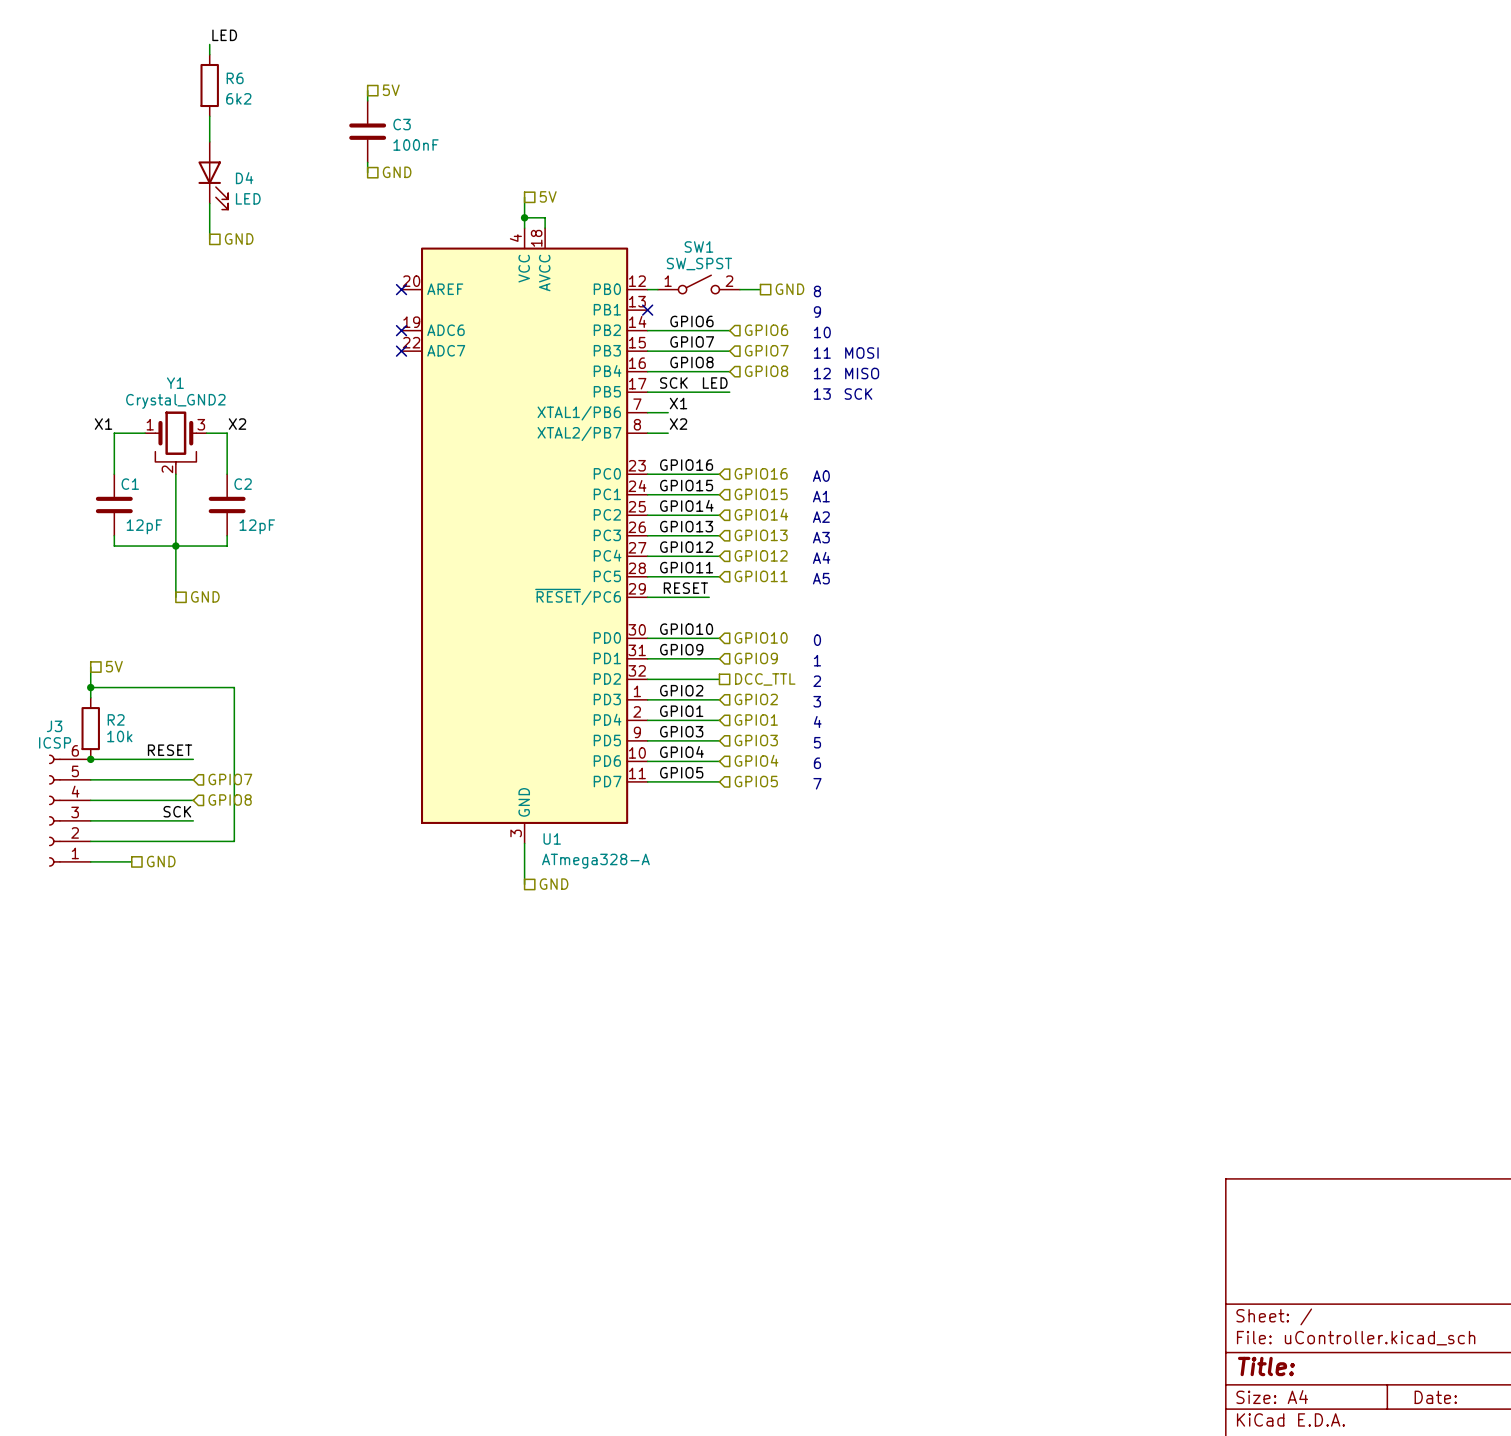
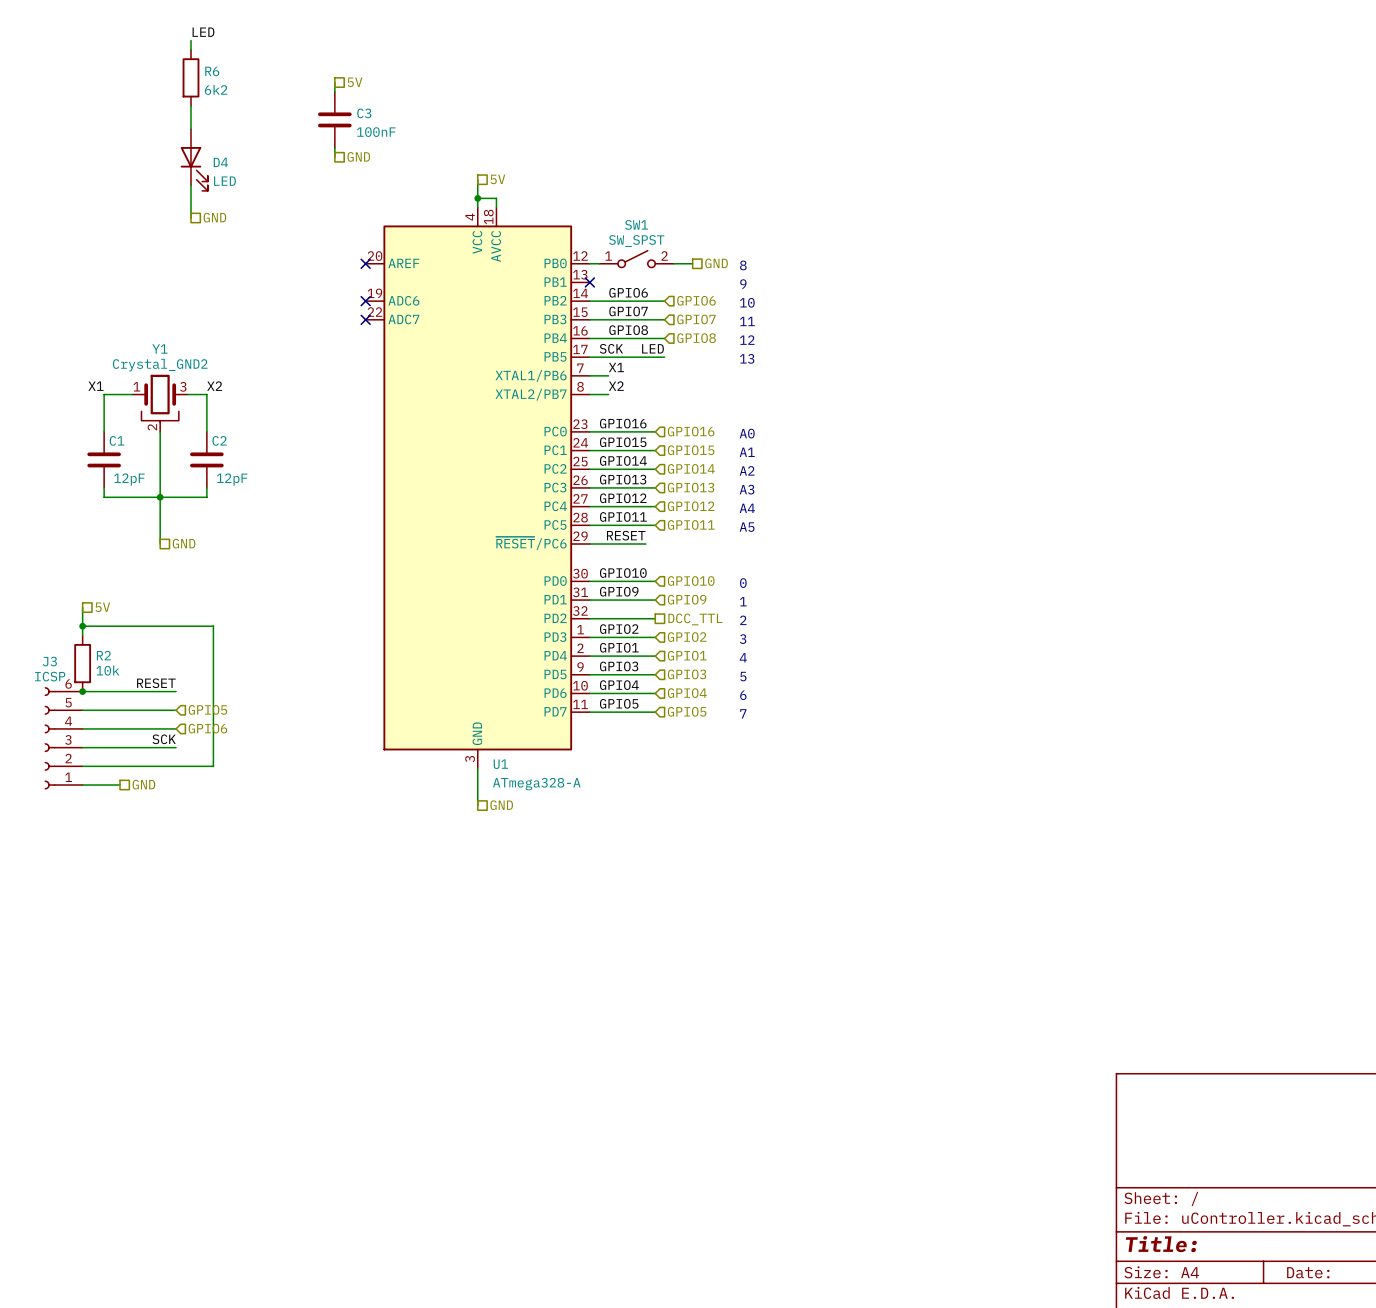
text: MOSI (861, 353) -> none
text: MISO (862, 373) -> none
text: SCK (858, 394) -> none
hierarchical label: GPIO7 (230, 779) -> GPIO5 (207, 709)
hierarchical label: GPIO8 (230, 800) -> GPIO6 (207, 728)

